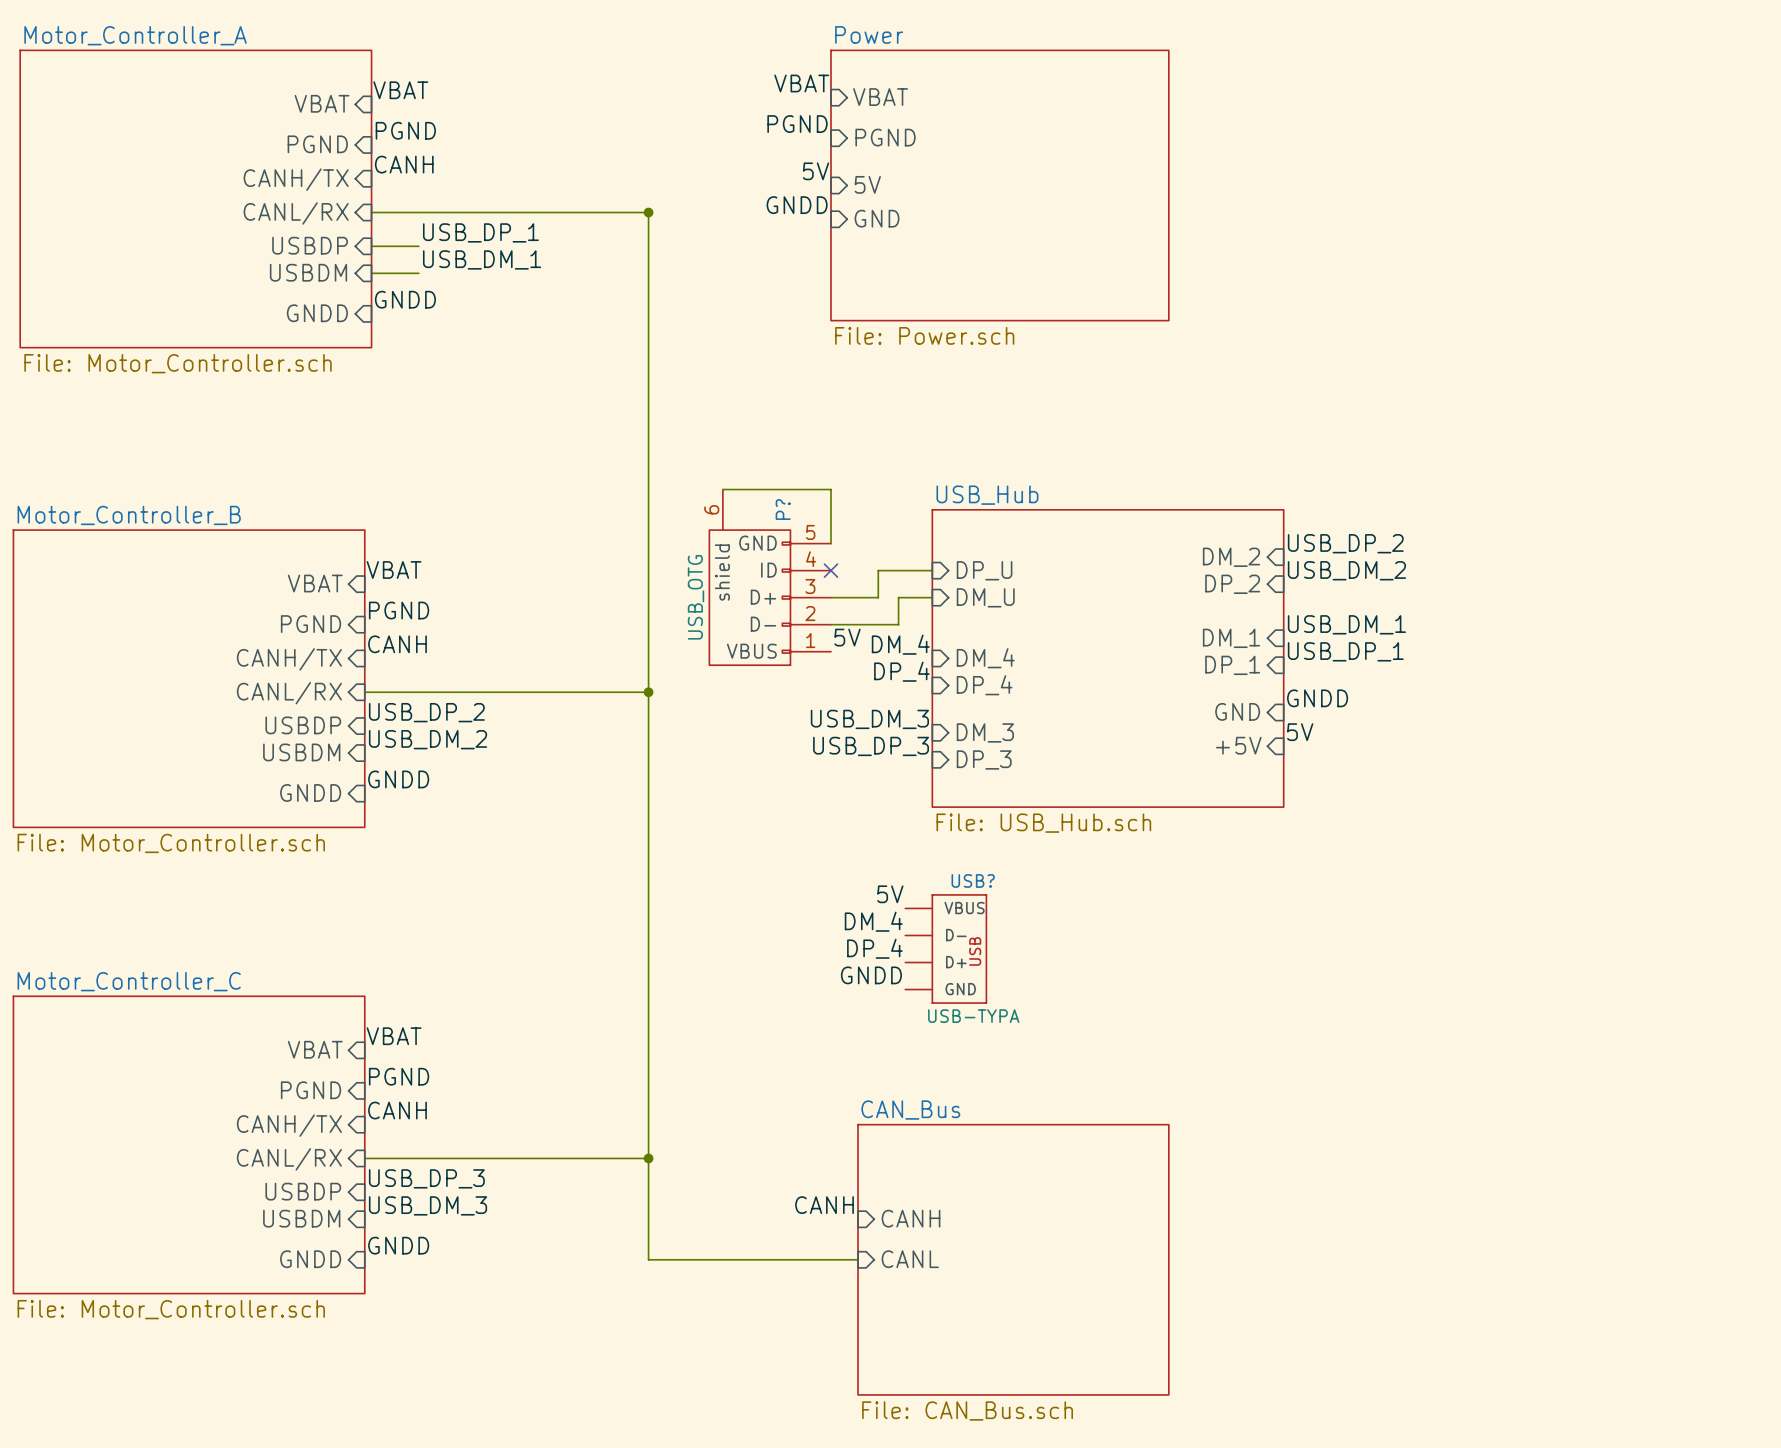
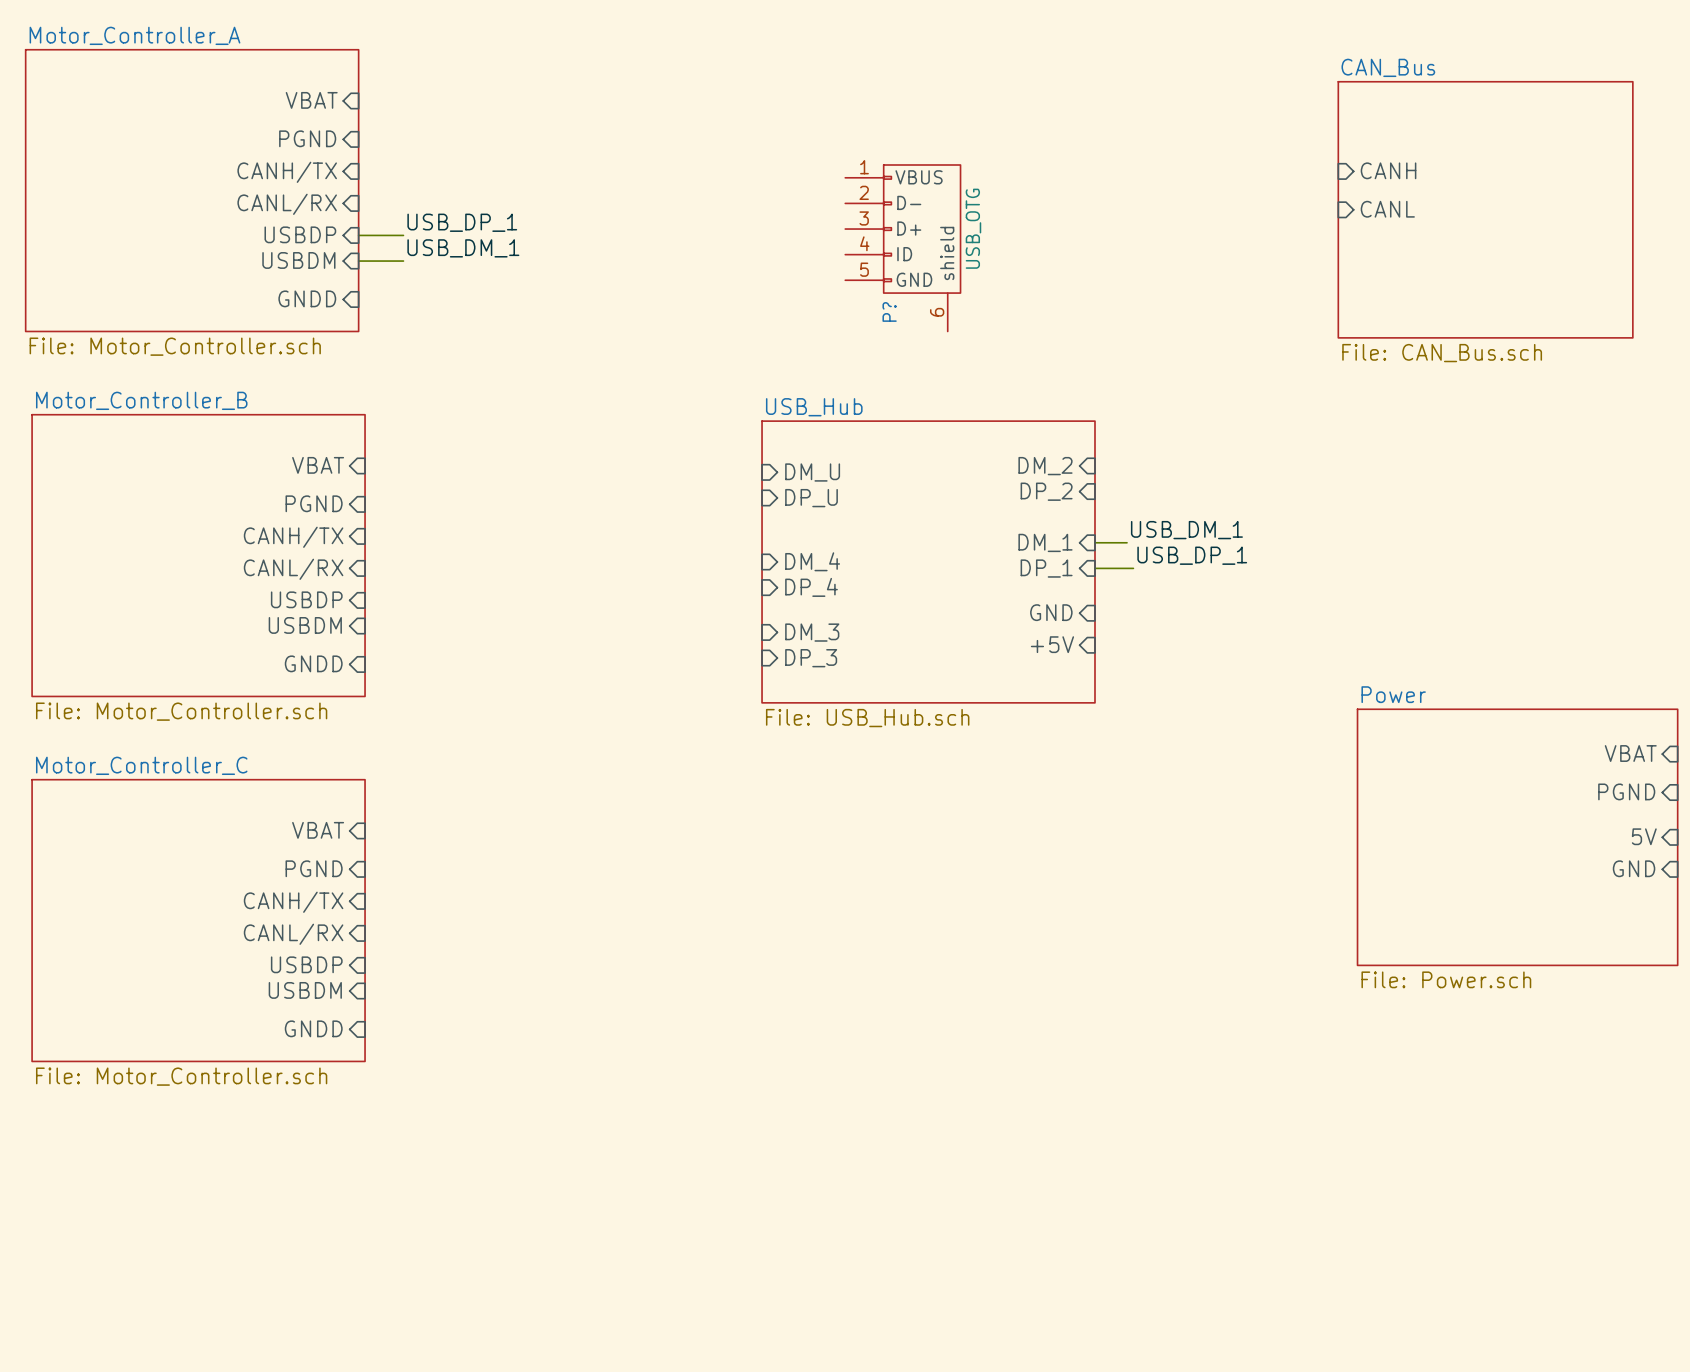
label: VBAT (801, 83) -> none
label: VBAT (400, 90) -> none
sheet pin: VBAT (880, 97) -> none
label: PGND (797, 124) -> none
label: PGND (405, 130) -> none
sheet pin: PGND (885, 137) -> none
label: CANH (404, 164) -> none
label: 5V (816, 171) -> none
sheet pin: none -> CANH (1388, 170)
sheet pin: 5V (867, 184) -> none
sheet Power: File: Power.sch (999, 185) -> none
label: GNDD (797, 205) -> none
wire: (371, 212) (648, 212) (648, 1259) (858, 1259) -> none
junction: (648, 212) -> none
sheet pin: GND (877, 218) -> none
sheet pin: none -> CANL (1387, 209)
sheet CAN_Bus: none -> File: CAN_Bus.sch (1485, 209)
P?: none -> USB_OTG (902, 248)
label: GNDD (405, 299) -> none
wire: (722, 489) (830, 489) (830, 543) -> none
label: USB_DP_2 (1345, 543) -> none
sheet pin position: DM_2 (1231, 557) -> DM_2 (1045, 466)
label: VBAT (394, 569) -> none
no-connect mark: (830, 570) -> none
wire: (932, 570) (878, 570) (878, 597) (830, 597) -> none
sheet pin position: DP_U (984, 570) -> DP_U (811, 498)
wire: none -> (1094, 542) (1127, 542)
label: USB_DM_2 (1346, 570) -> none
P?: USB_OTG (770, 577) -> none
sheet pin position: VBAT (315, 583) -> VBAT (318, 465)
sheet pin position: DP_2 (1232, 584) -> DP_2 (1046, 491)
wire: (932, 597) (898, 597) (898, 624) (830, 624) -> none
sheet pin position: DM_U (985, 597) -> DM_U (812, 472)
wire: none -> (1094, 568) (1133, 568)
label: PGND (399, 610) -> none
sheet pin position: PGND (311, 624) -> PGND (314, 503)
label position: USB_DM_1 (1346, 624) -> USB_DM_1 (1186, 530)
label: 5V (847, 637) -> none
sheet pin position: DM_1 (1231, 638) -> DM_1 (1045, 542)
label: CANH (397, 644) -> none
label: DM_4 (900, 644) -> none
label position: USB_DP_1 (1345, 651) -> USB_DP_1 (1192, 555)
sheet pin position: DM_4 (985, 658) -> DM_4 (812, 561)
sheet USB_Hub position: (1108, 658) -> (928, 561)
sheet pin position: CANH/TX (289, 659) -> CANH/TX (293, 537)
sheet pin position: DP_1 (1232, 665) -> DP_1 (1046, 568)
label: DP_4 (901, 671) -> none
sheet Motor_Controller_B position: (189, 678) -> (198, 555)
sheet pin position: DP_4 (984, 685) -> DP_4 (811, 587)
wire: (364, 692) (648, 692) -> none
junction: (648, 692) -> none
sheet pin position: CANL/RX (289, 693) -> CANL/RX (293, 569)
label: GNDD (1317, 698) -> none
sheet pin position: GND (1237, 711) -> GND (1051, 612)
label: USB_DP_2 (426, 712) -> none
label: USB_DM_3 (869, 719) -> none
sheet pin position: USBDP (303, 725) -> USBDP (306, 599)
sheet pin position: DM_3 (985, 732) -> DM_3 (812, 632)
label: 5V (1300, 732) -> none
label: USB_DM_2 (428, 739) -> none
sheet pin position: +5V (1238, 745) -> +5V (1052, 644)
label: USB_DP_3 (871, 746) -> none
sheet pin position: USBDM (301, 752) -> USBDM (305, 625)
sheet pin position: DP_3 (984, 759) -> DP_3 (811, 658)
label: GNDD (398, 779) -> none
sheet pin position: GNDD (310, 792) -> GNDD (313, 663)
sheet pin: none -> VBAT (1630, 753)
sheet pin: none -> PGND (1626, 791)
sheet pin: none -> VBAT (318, 830)
sheet pin: none -> 5V (1644, 836)
sheet Power: none -> File: Power.sch (1517, 837)
label: 5V (890, 894) -> none
sheet pin: none -> PGND (314, 868)
sheet pin: none -> GND (1634, 868)
label: DM_4 (873, 921) -> none
label: DP_4 (874, 948) -> none
sheet pin: none -> CANH/TX (293, 902)
USB?: USB-TYPA (945, 949) -> none
label: GNDD (871, 975) -> none
sheet pin: none -> CANL/RX (293, 934)
sheet pin: none -> USBDP (306, 964)
label: VBAT (394, 1036) -> none
sheet pin: none -> USBDM (305, 990)
sheet pin: VBAT (315, 1049) -> none
label: PGND (399, 1076) -> none
sheet pin: PGND (311, 1090) -> GNDD (313, 1028)
label: CANH (397, 1110) -> none
sheet pin: CANH/TX (289, 1125) -> none
sheet Motor_Controller_C position: (189, 1144) -> (198, 920)
wire: (364, 1158) (648, 1158) -> none
junction: (648, 1158) -> none
sheet pin: CANL/RX (289, 1159) -> none
label: USB_DP_3 (426, 1178) -> none
sheet pin: USBDP (303, 1191) -> none
label: USB_DM_3 (428, 1205) -> none
label: CANH (824, 1205) -> none
sheet pin: USBDM (301, 1218) -> none
sheet pin: CANH (911, 1218) -> none
label: GNDD (398, 1245) -> none
sheet pin: GNDD (310, 1259) -> none
sheet pin: CANL (910, 1259) -> none
sheet CAN_Bus: File: CAN_Bus.sch (1013, 1259) -> none

